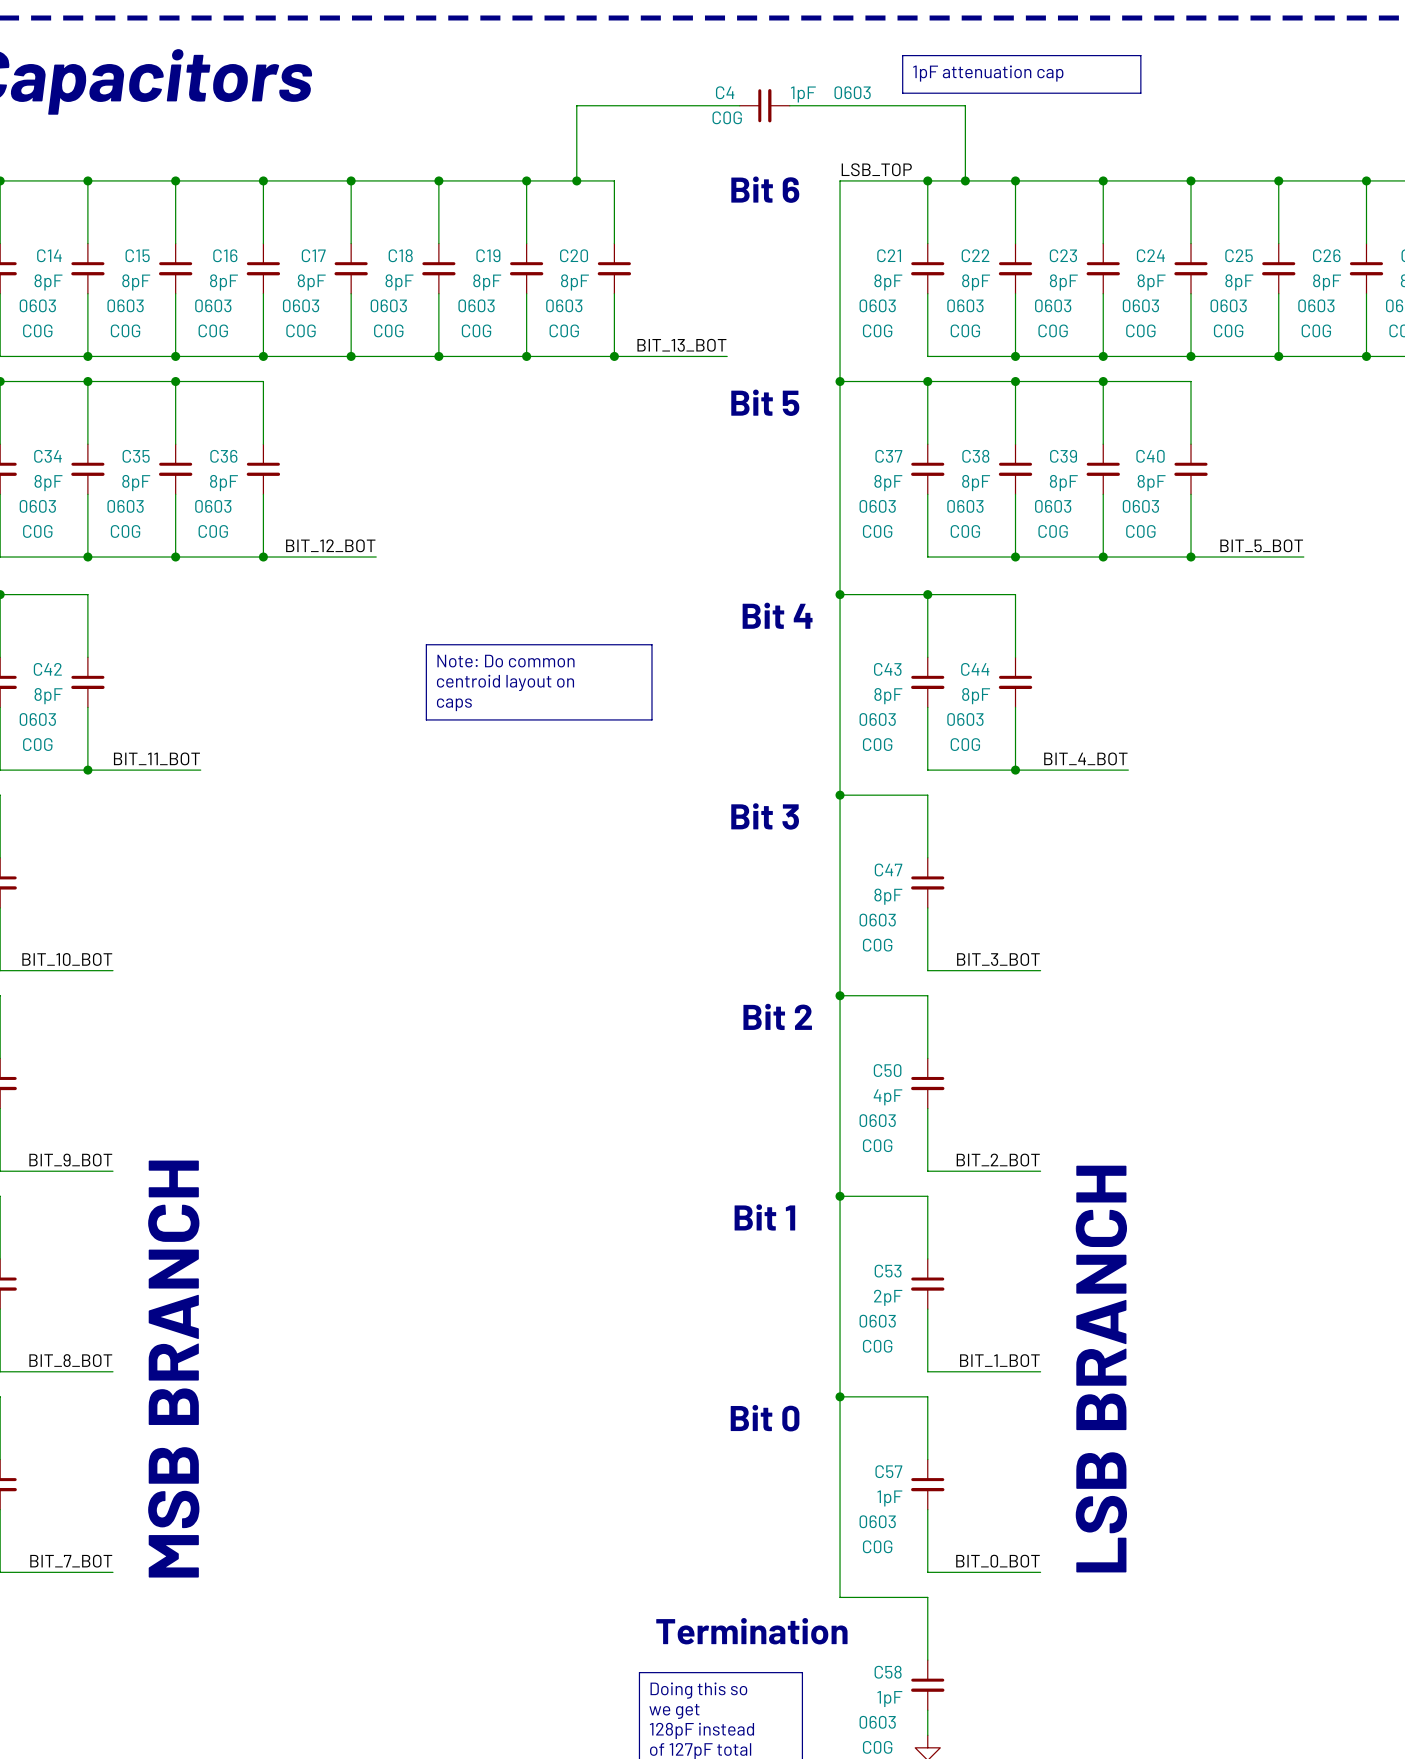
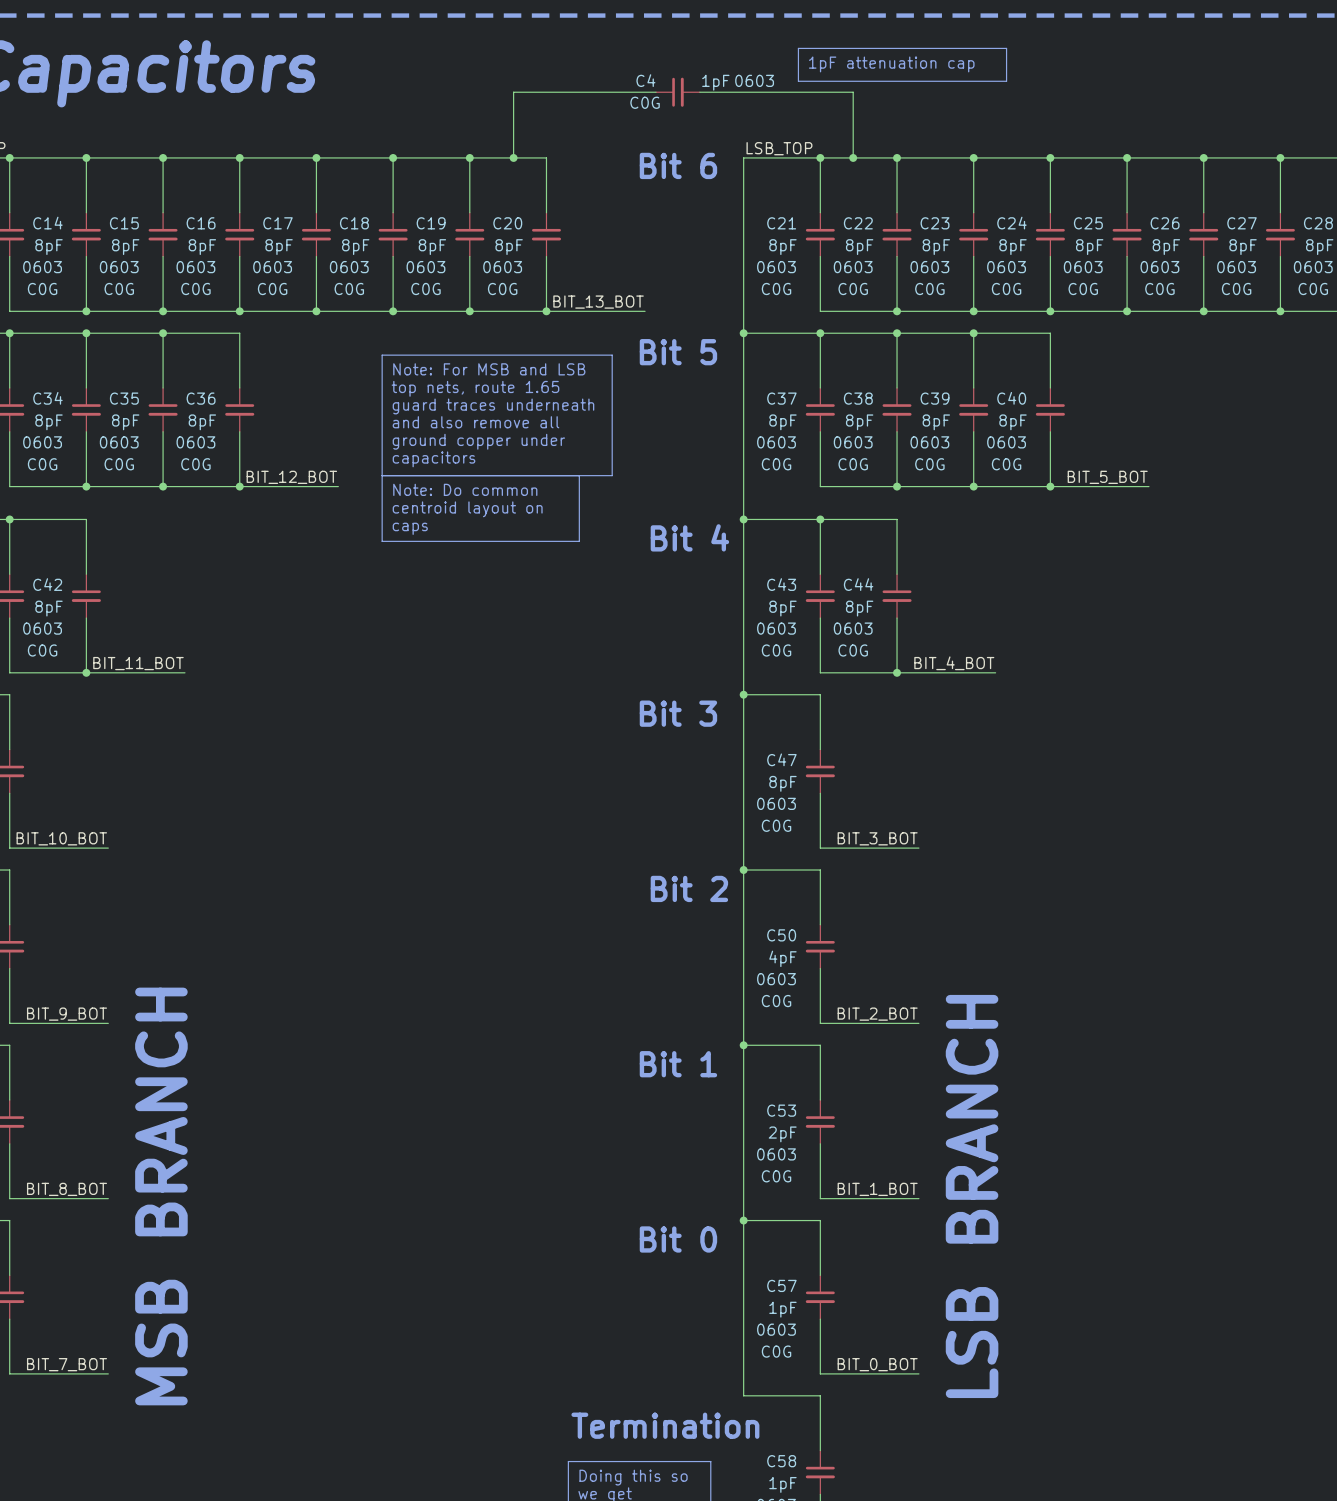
text: none -> Note: For MSB and LSB (489, 369)
text: none -> top nets, route 1.65 (475, 388)
text: none -> guard traces underneath (493, 406)
text: none -> and also remove all (476, 422)
text: none -> ground copper under (478, 441)
text: none -> capacitors (434, 459)
line: none -> (382, 475) (612, 475) (612, 355) (382, 355) (382, 541) (579, 541) (579, 475)
line: (426, 644) (651, 644) (651, 719) (426, 719) (426, 644) -> none
text position: Note: Do common (505, 661) -> Note: Do common (465, 489)
text position: centroid layout on (505, 682) -> centroid layout on (467, 509)
text position: caps (454, 704) -> caps (410, 528)

